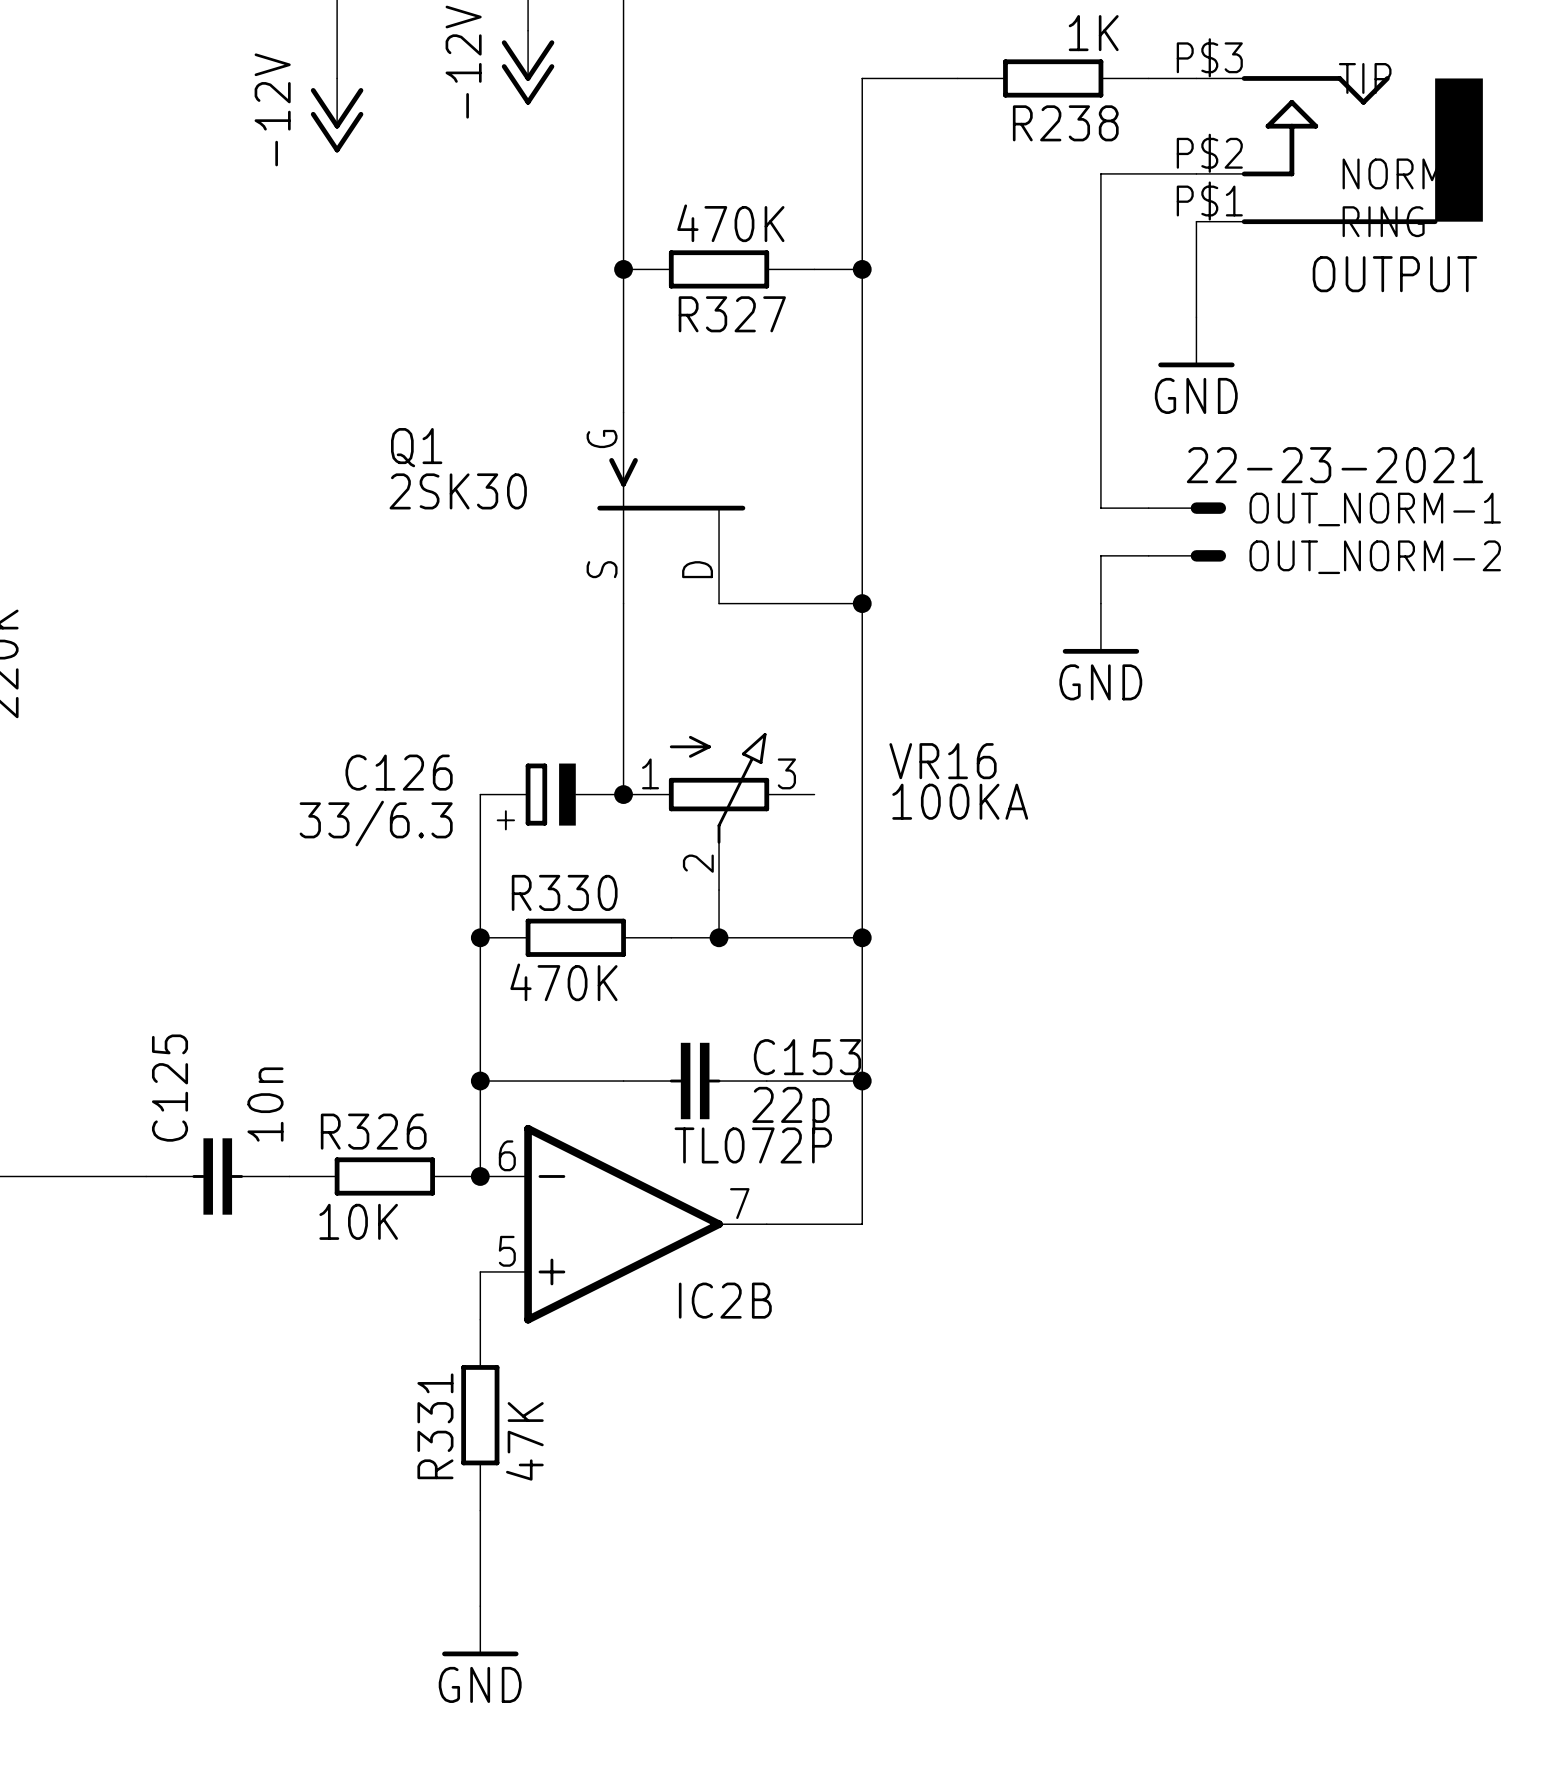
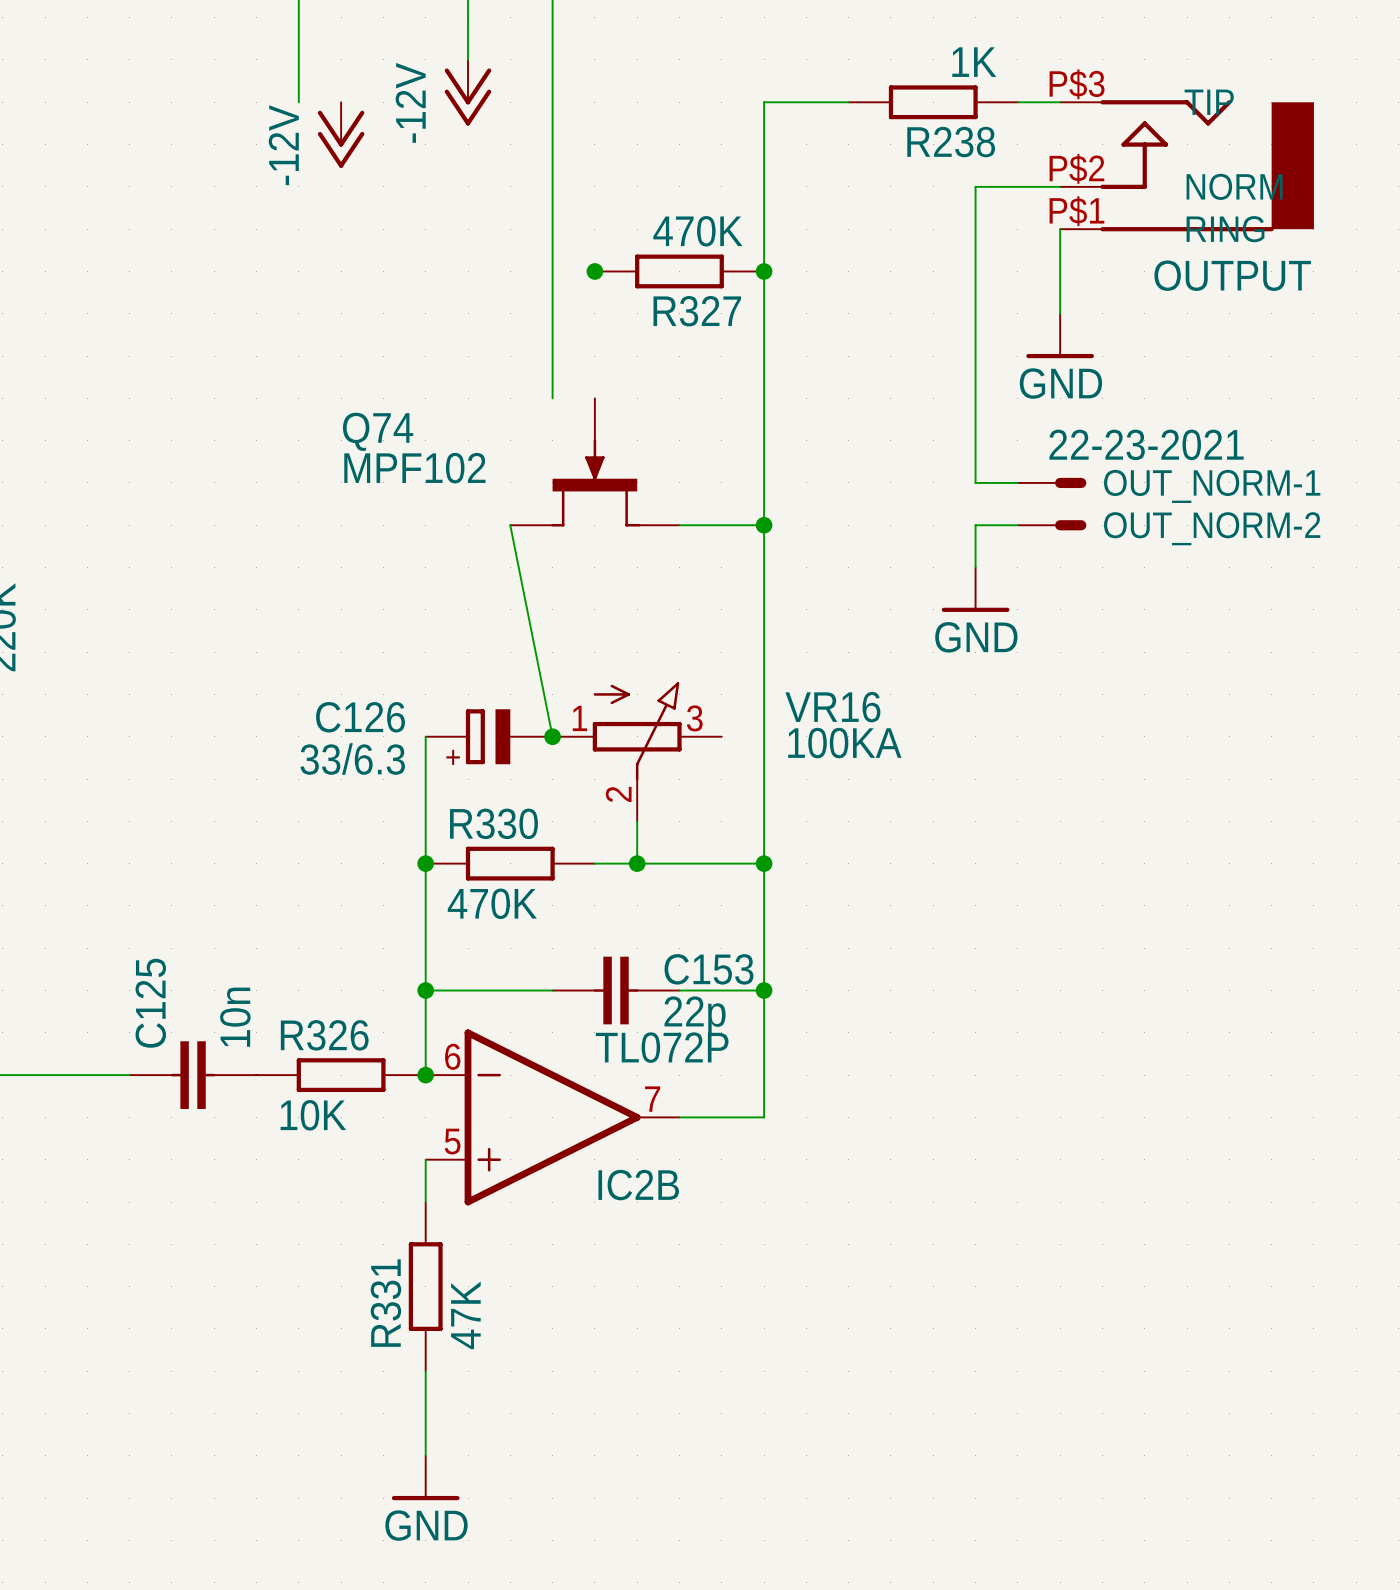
power symbol position: -12V (337, 115) -> -12V (341, 135)
junction position: (623, 269) -> (594, 271)
R327 position: (719, 269) -> (679, 271)
Q74: none -> MPF102 (594, 462)
Q1: 2SK30 (671, 508) -> none
wire: none -> (679, 525) (764, 525)
wire: (623, 603) (623, 794) -> (510, 525) (552, 736)
wire: (719, 603) (862, 603) -> none
junction position: (862, 603) -> (764, 525)

